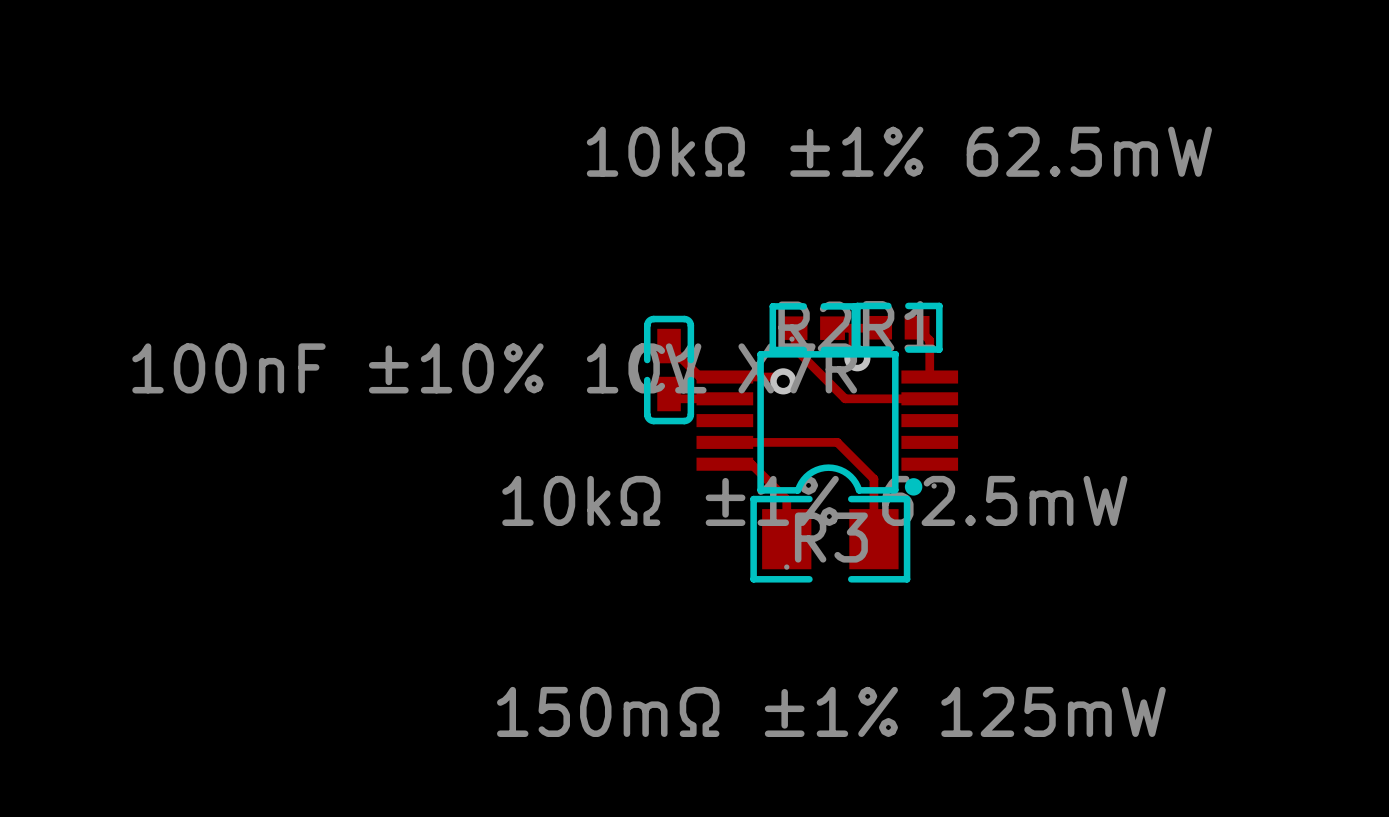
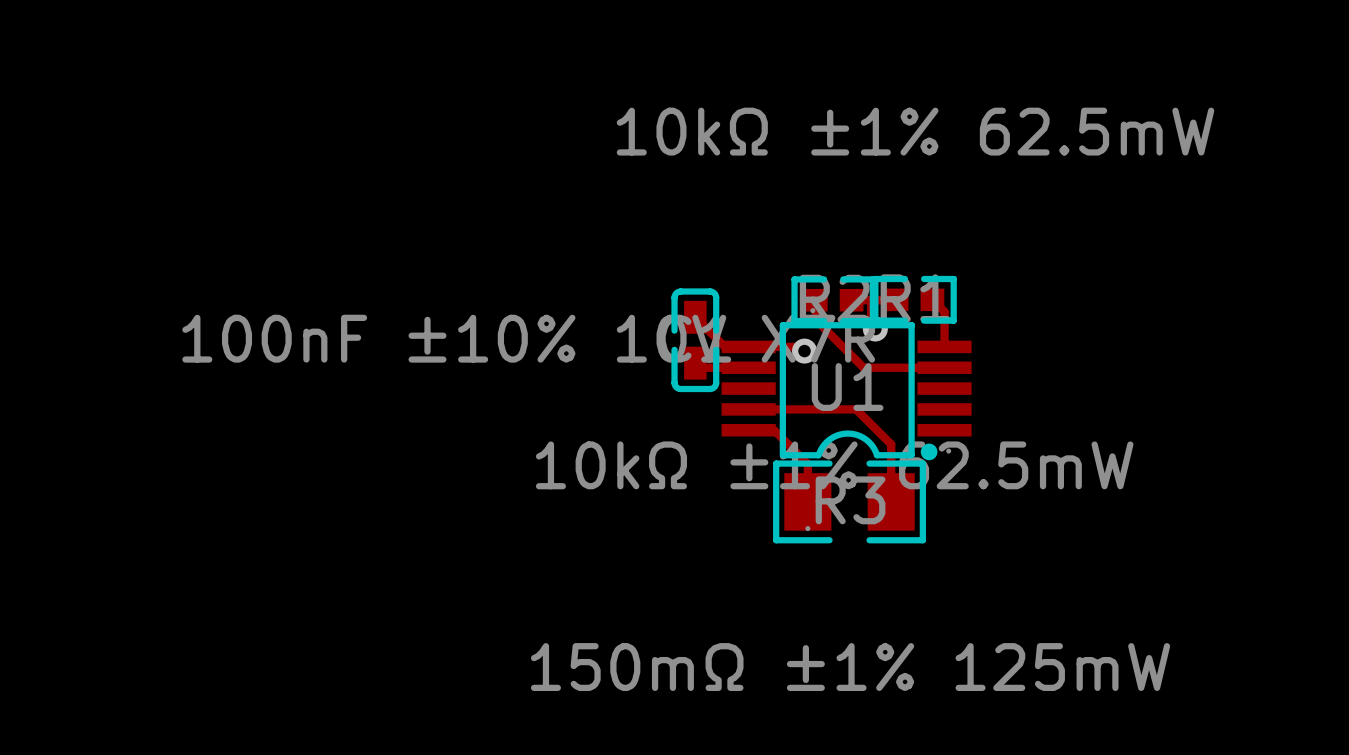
U1 name: none -> U1 (847, 387)

